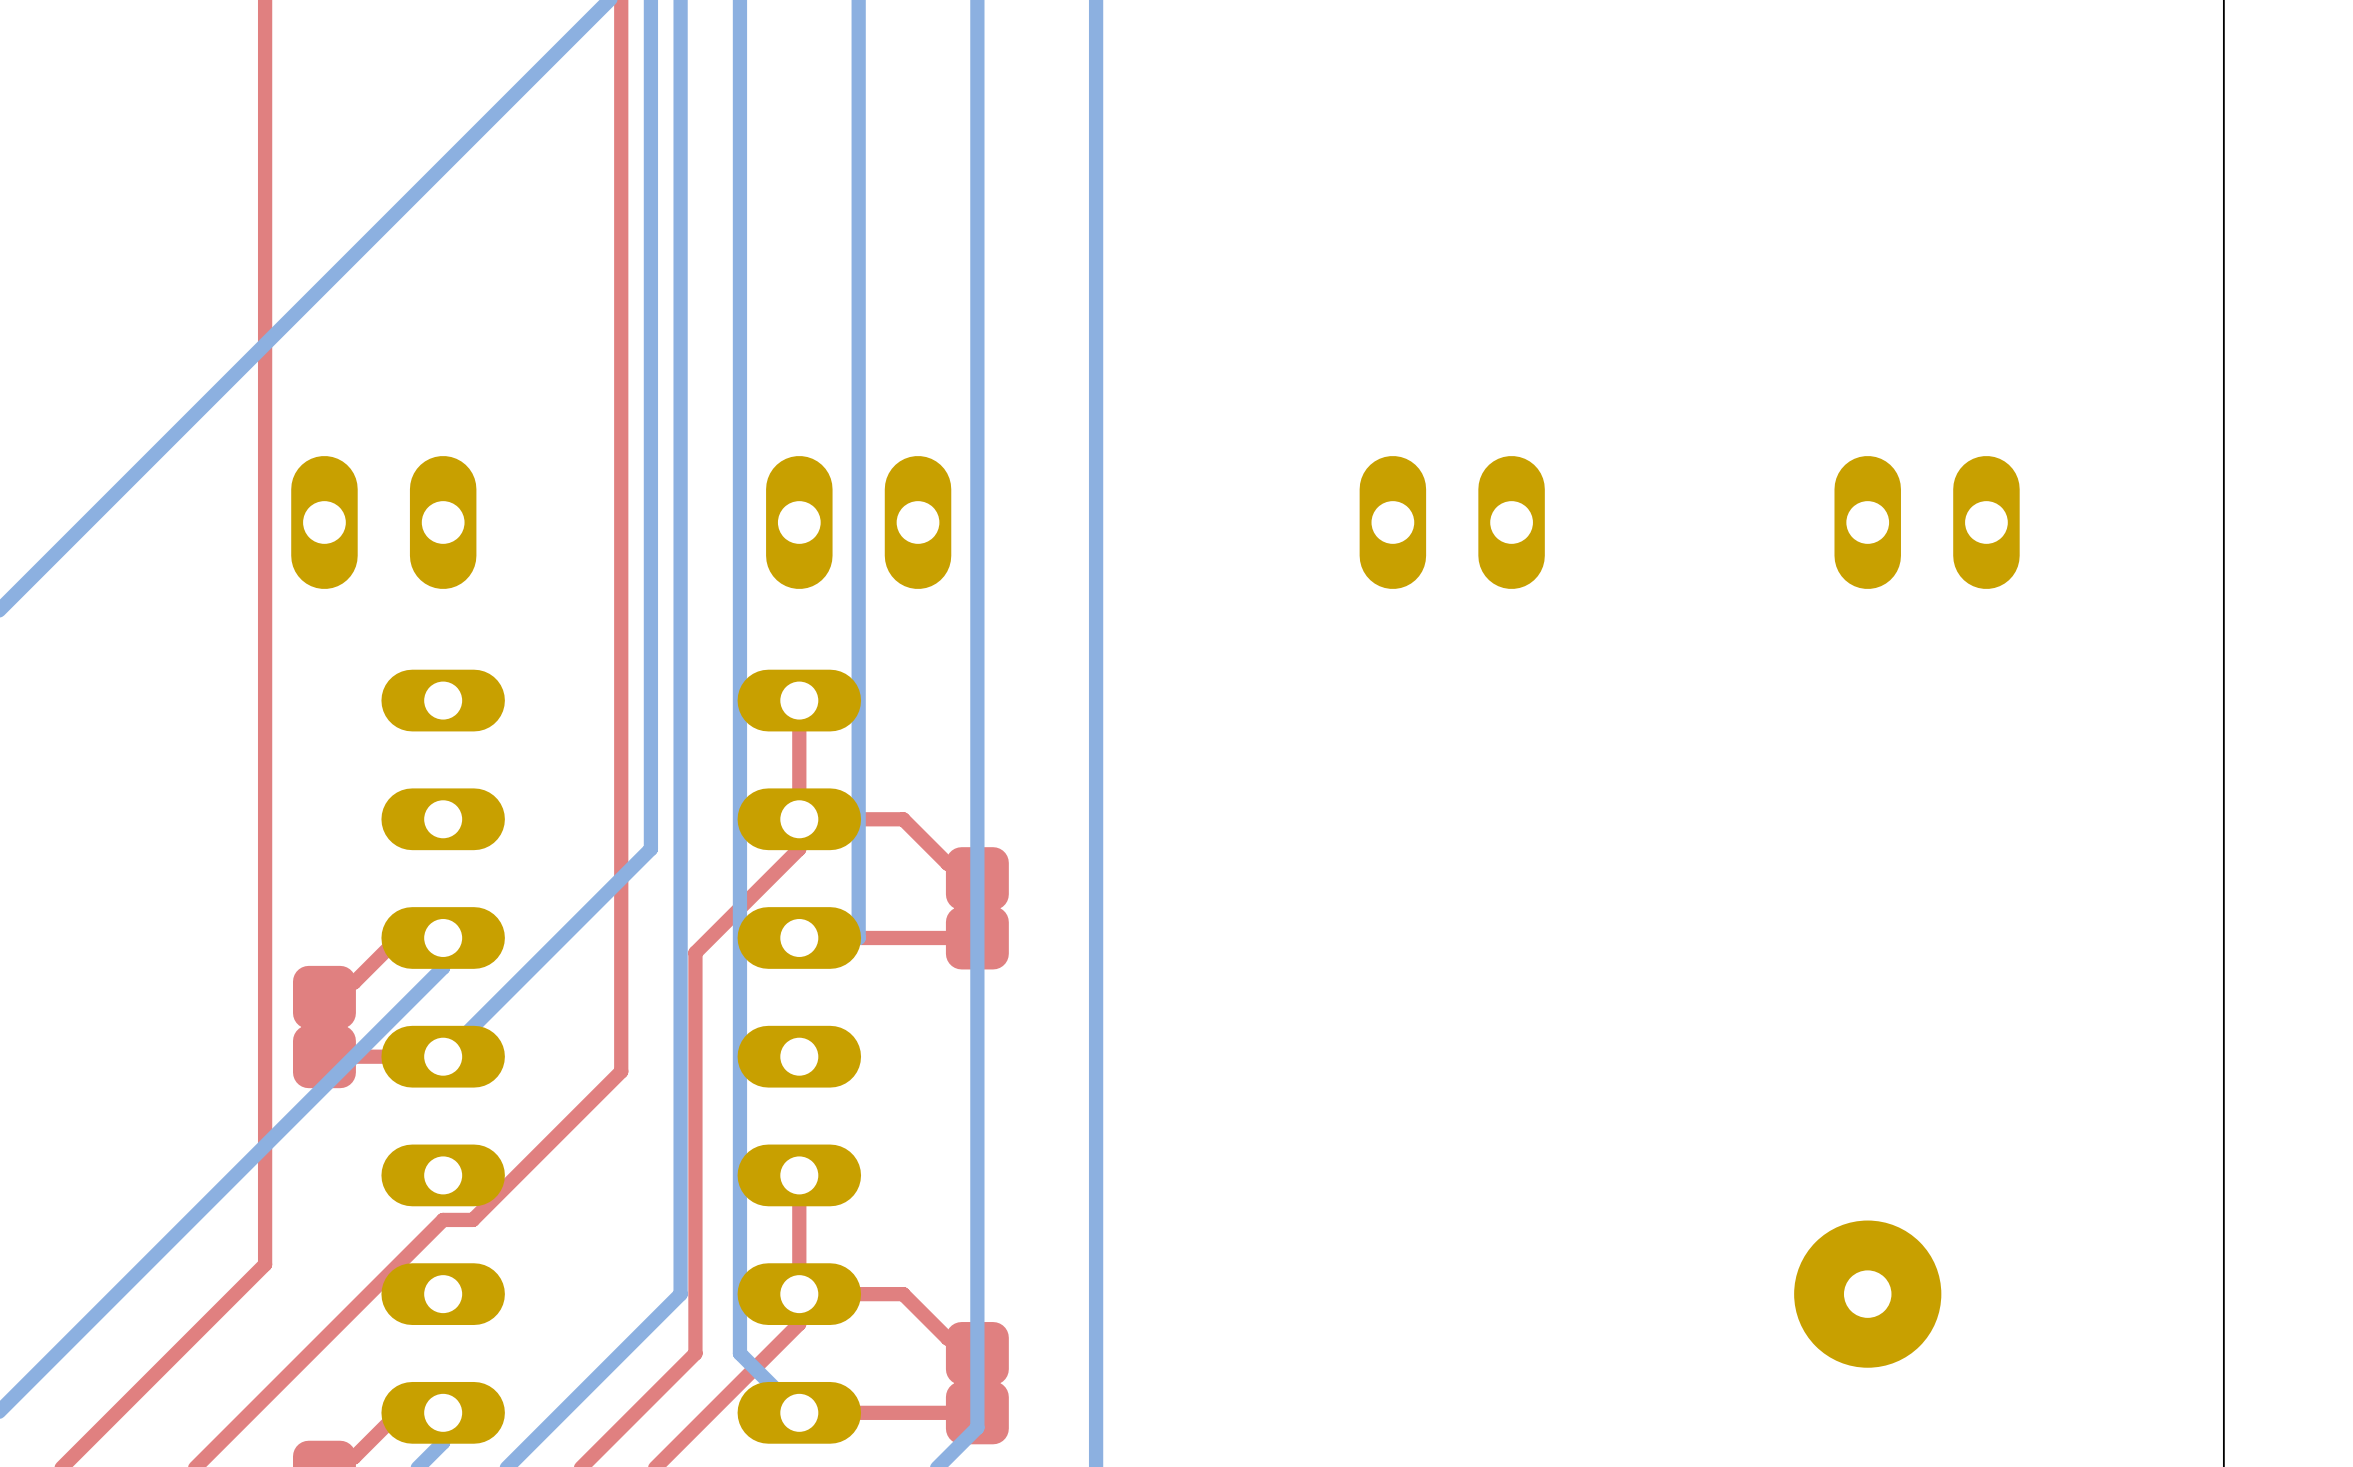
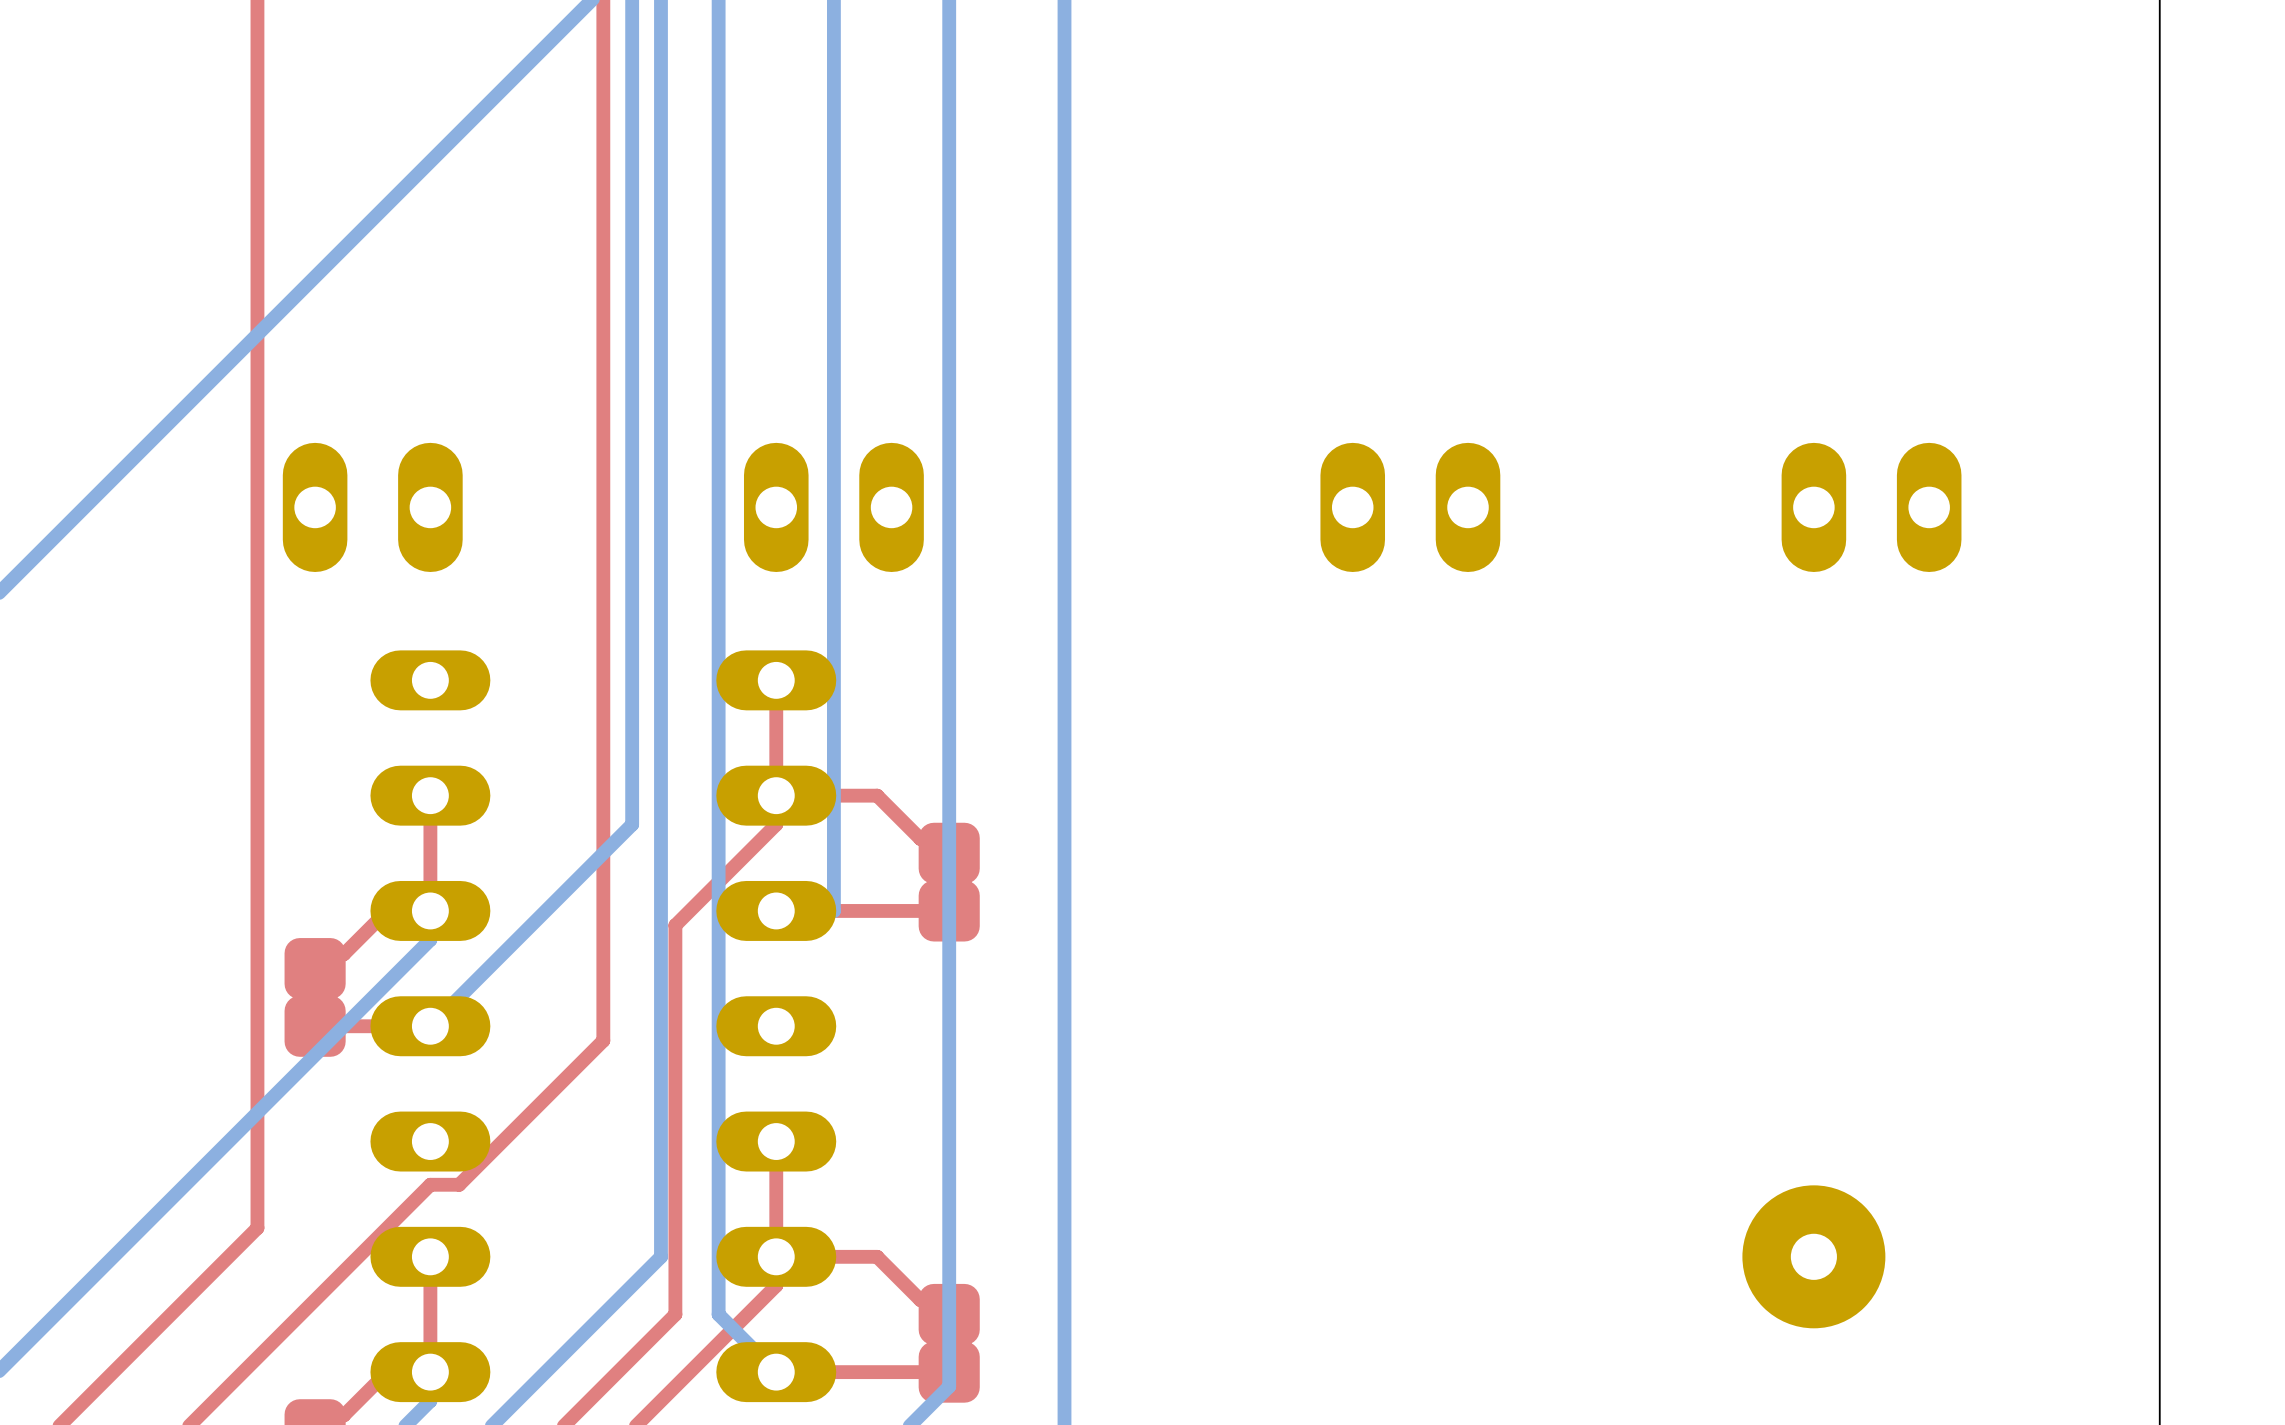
top track: none -> (430, 795) (430, 910)
top track: none -> (430, 1256) (430, 1372)

